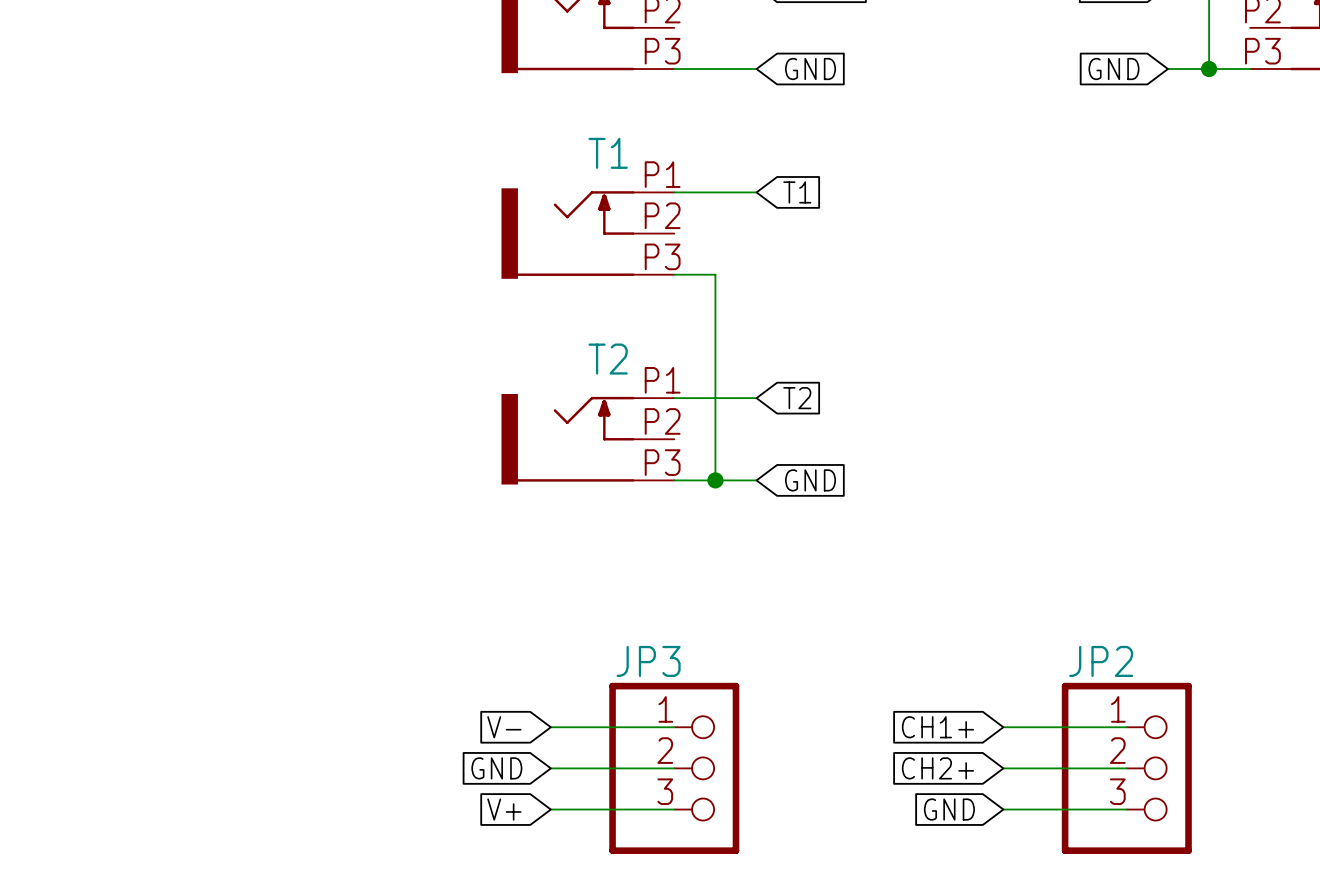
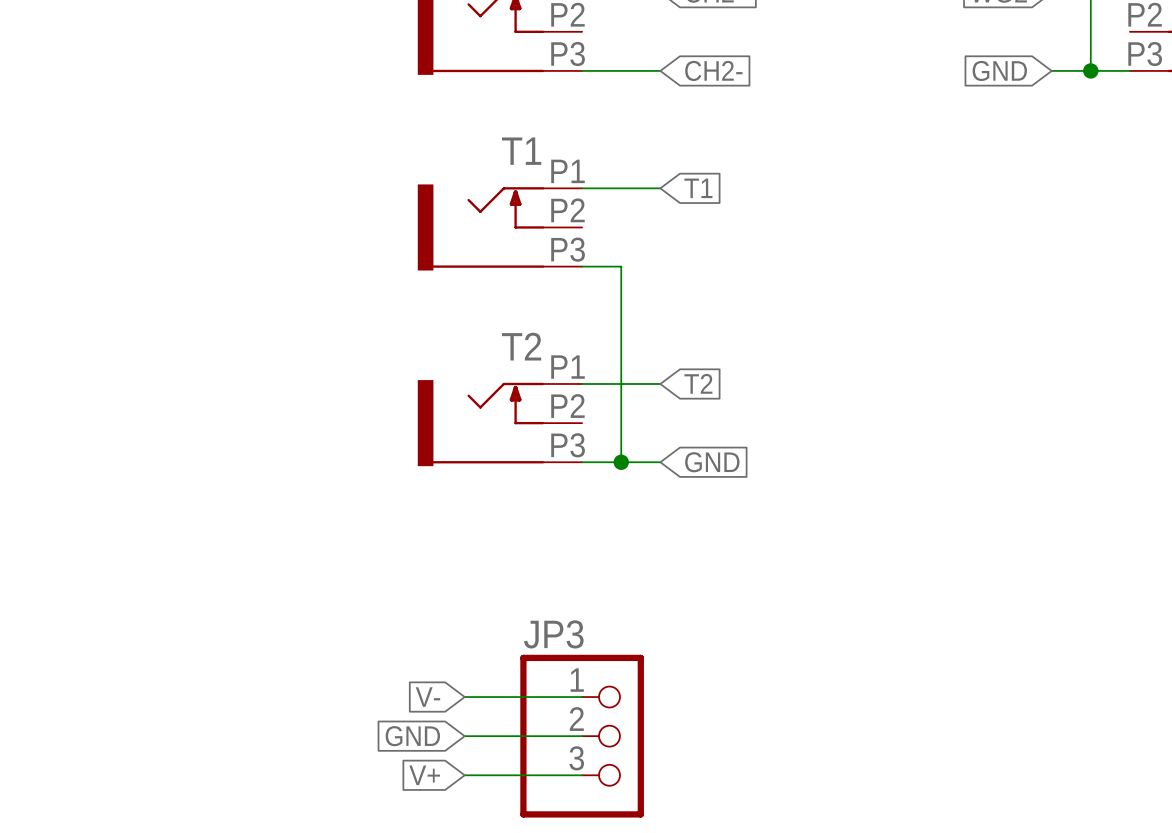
global label: GND (810, 69) -> CH2- (713, 70)
global label: CH1+ (937, 727) -> none
wire: (1003, 727) (1126, 727) -> none
global label: CH2+ (937, 768) -> none
wire: (1003, 768) (1126, 768) -> none
JP2: (1126, 768) -> none
global label: GND (949, 809) -> none
wire: (1003, 809) (1126, 809) -> none

